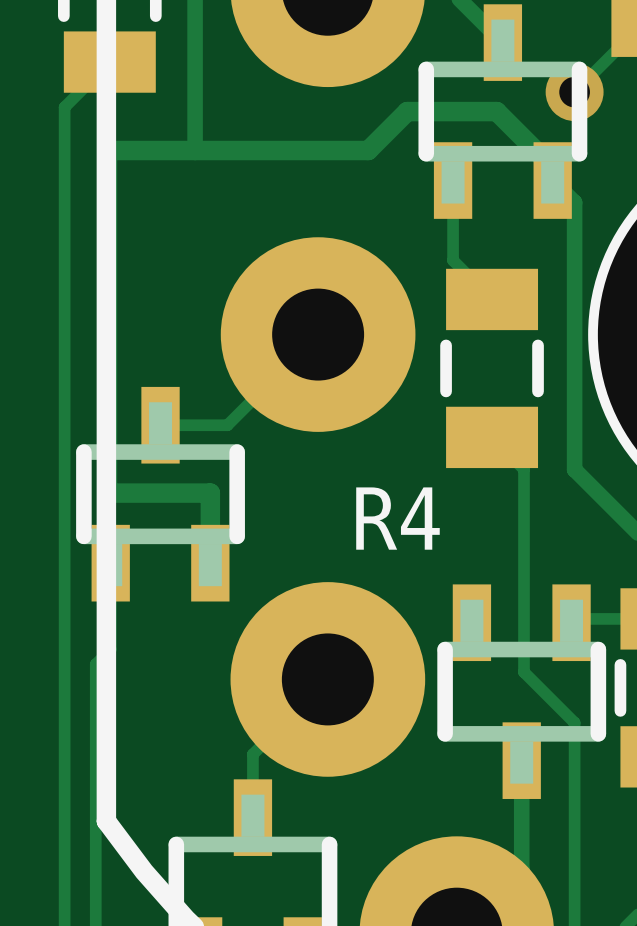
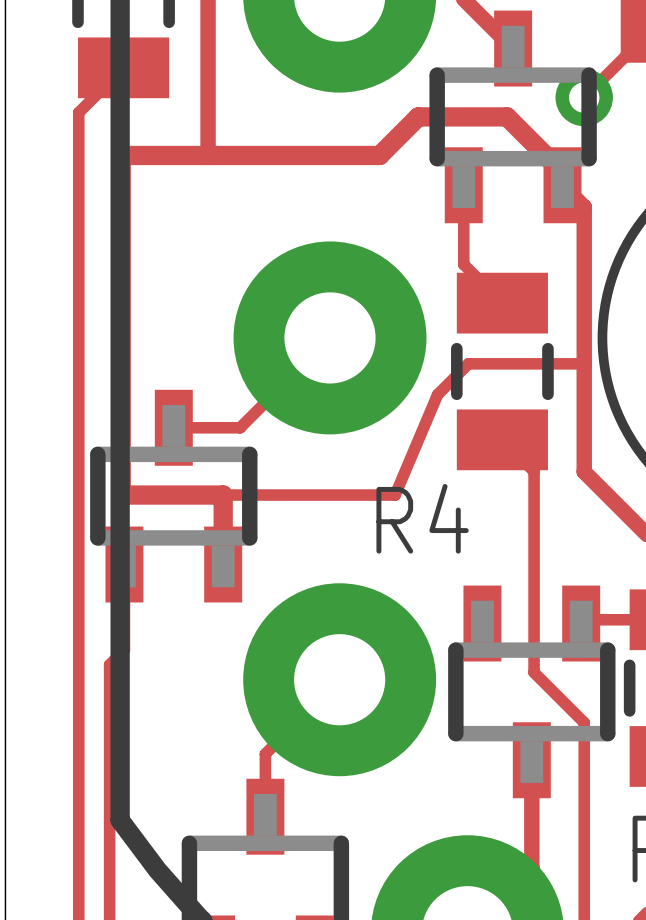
track: none -> (584, 363) (468, 363) (437, 394) (395, 495) (223, 495)

